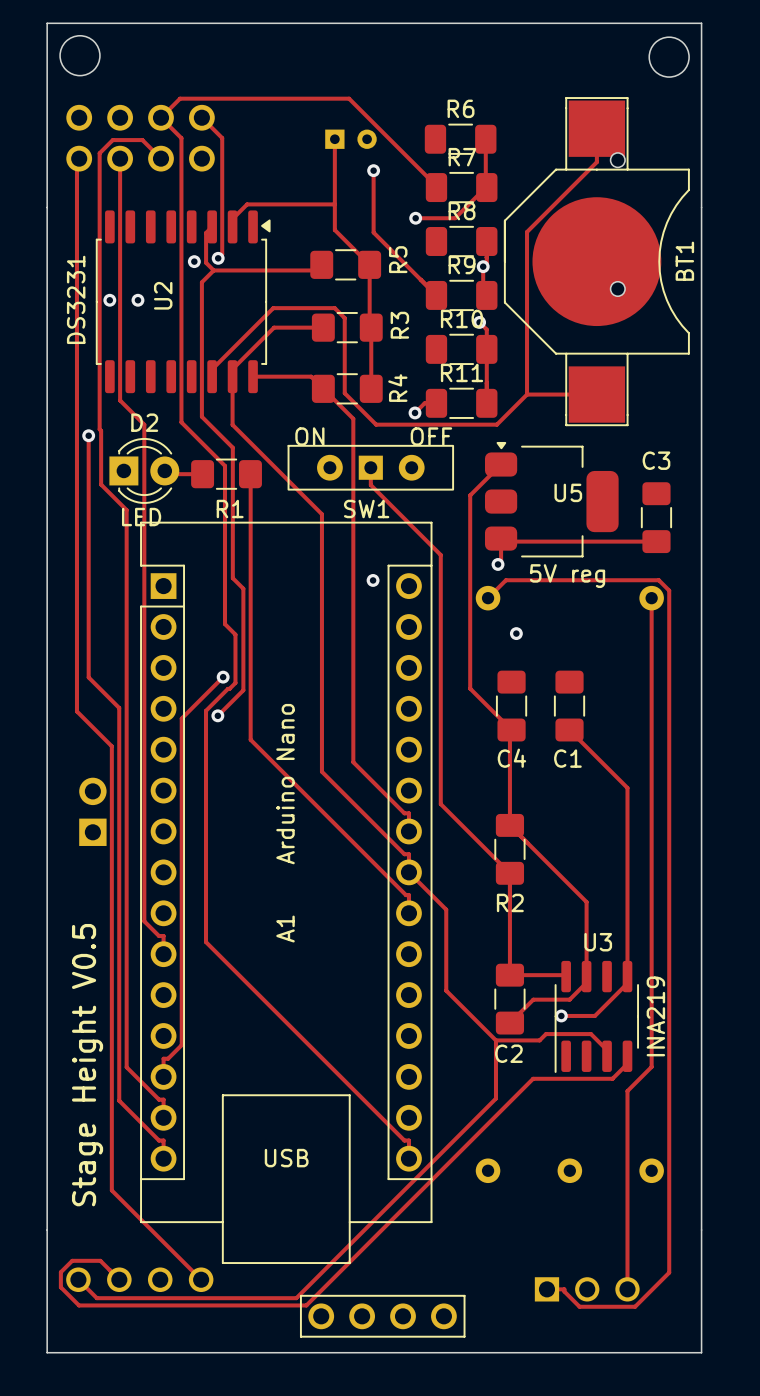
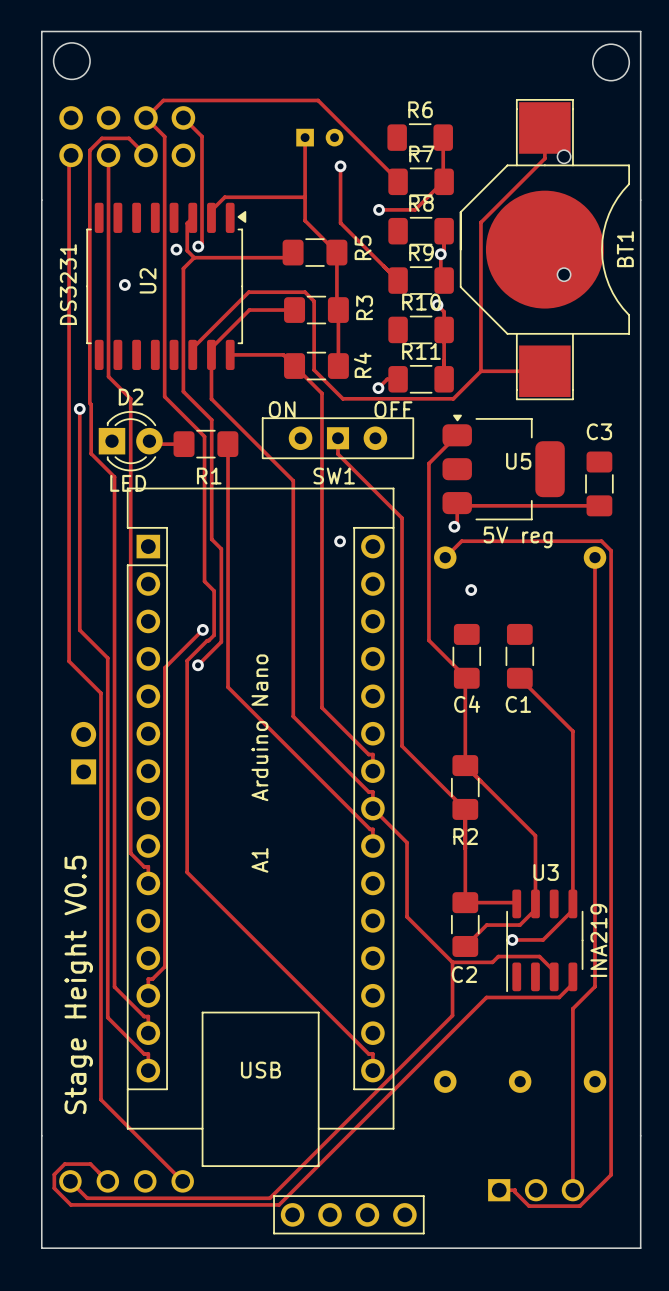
via: (109, 300) -> none

